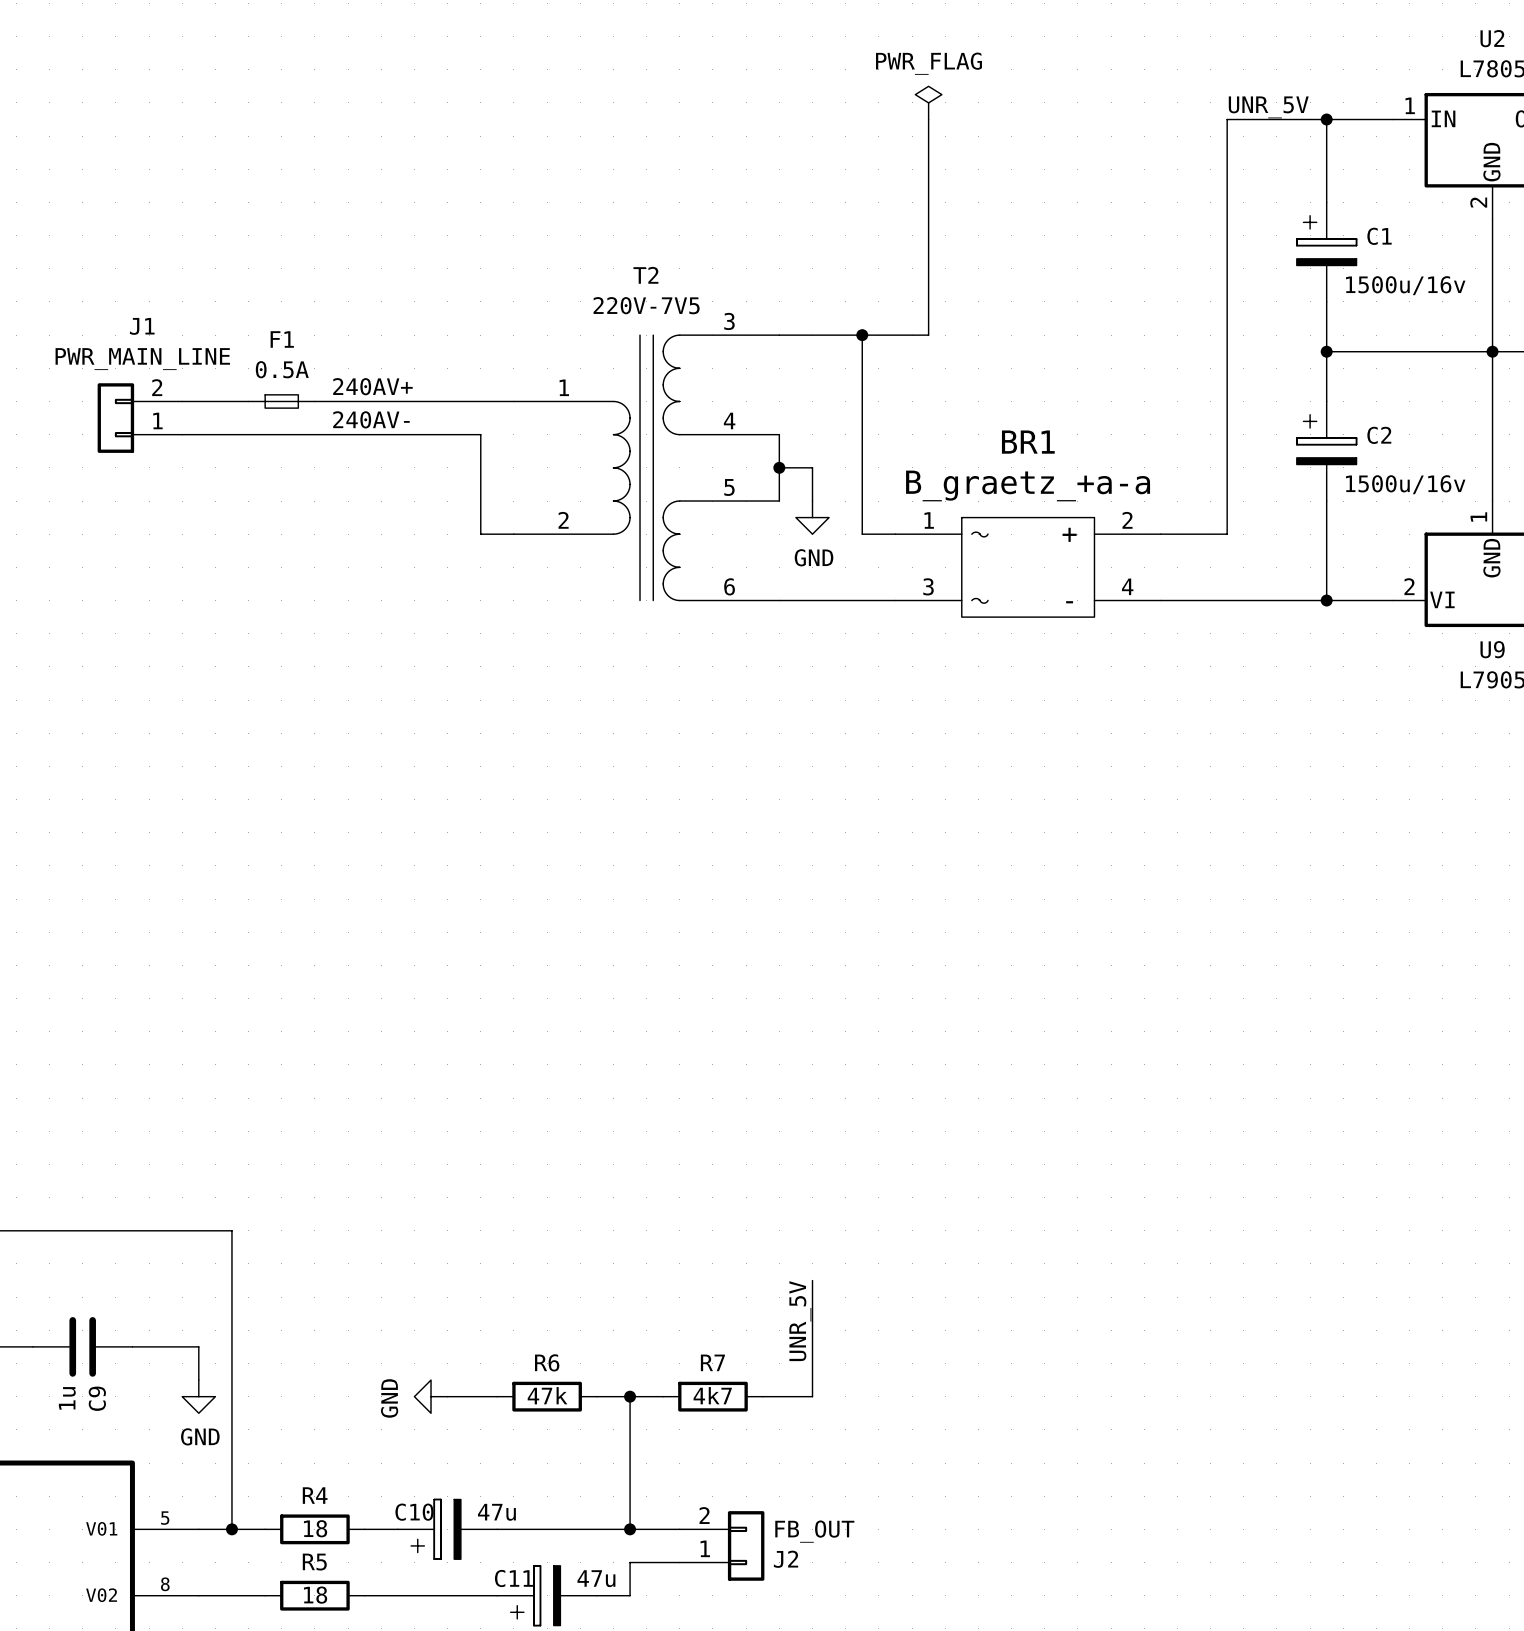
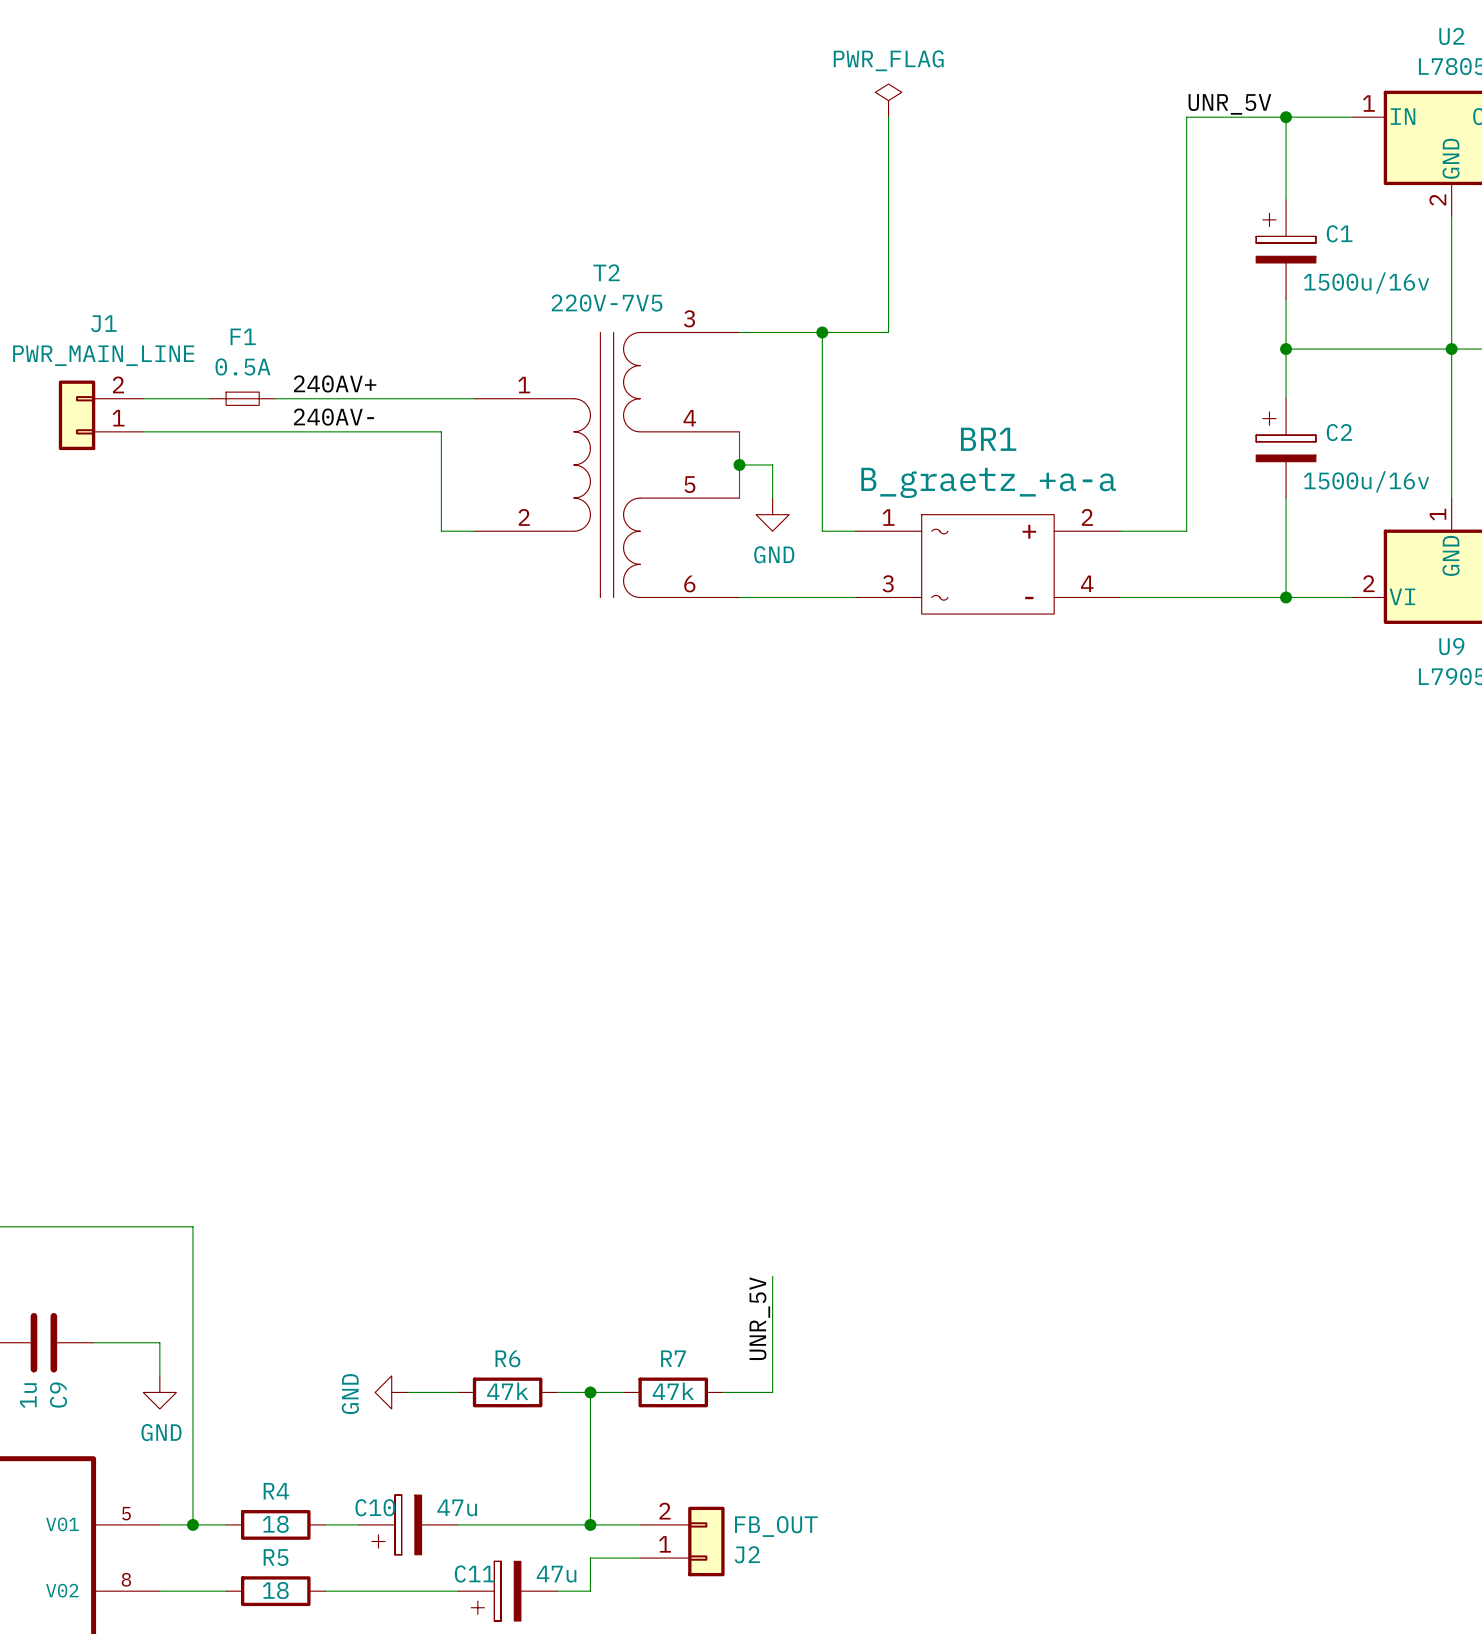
R7 value: 4k7 (712, 1395) -> 47k (673, 1391)

